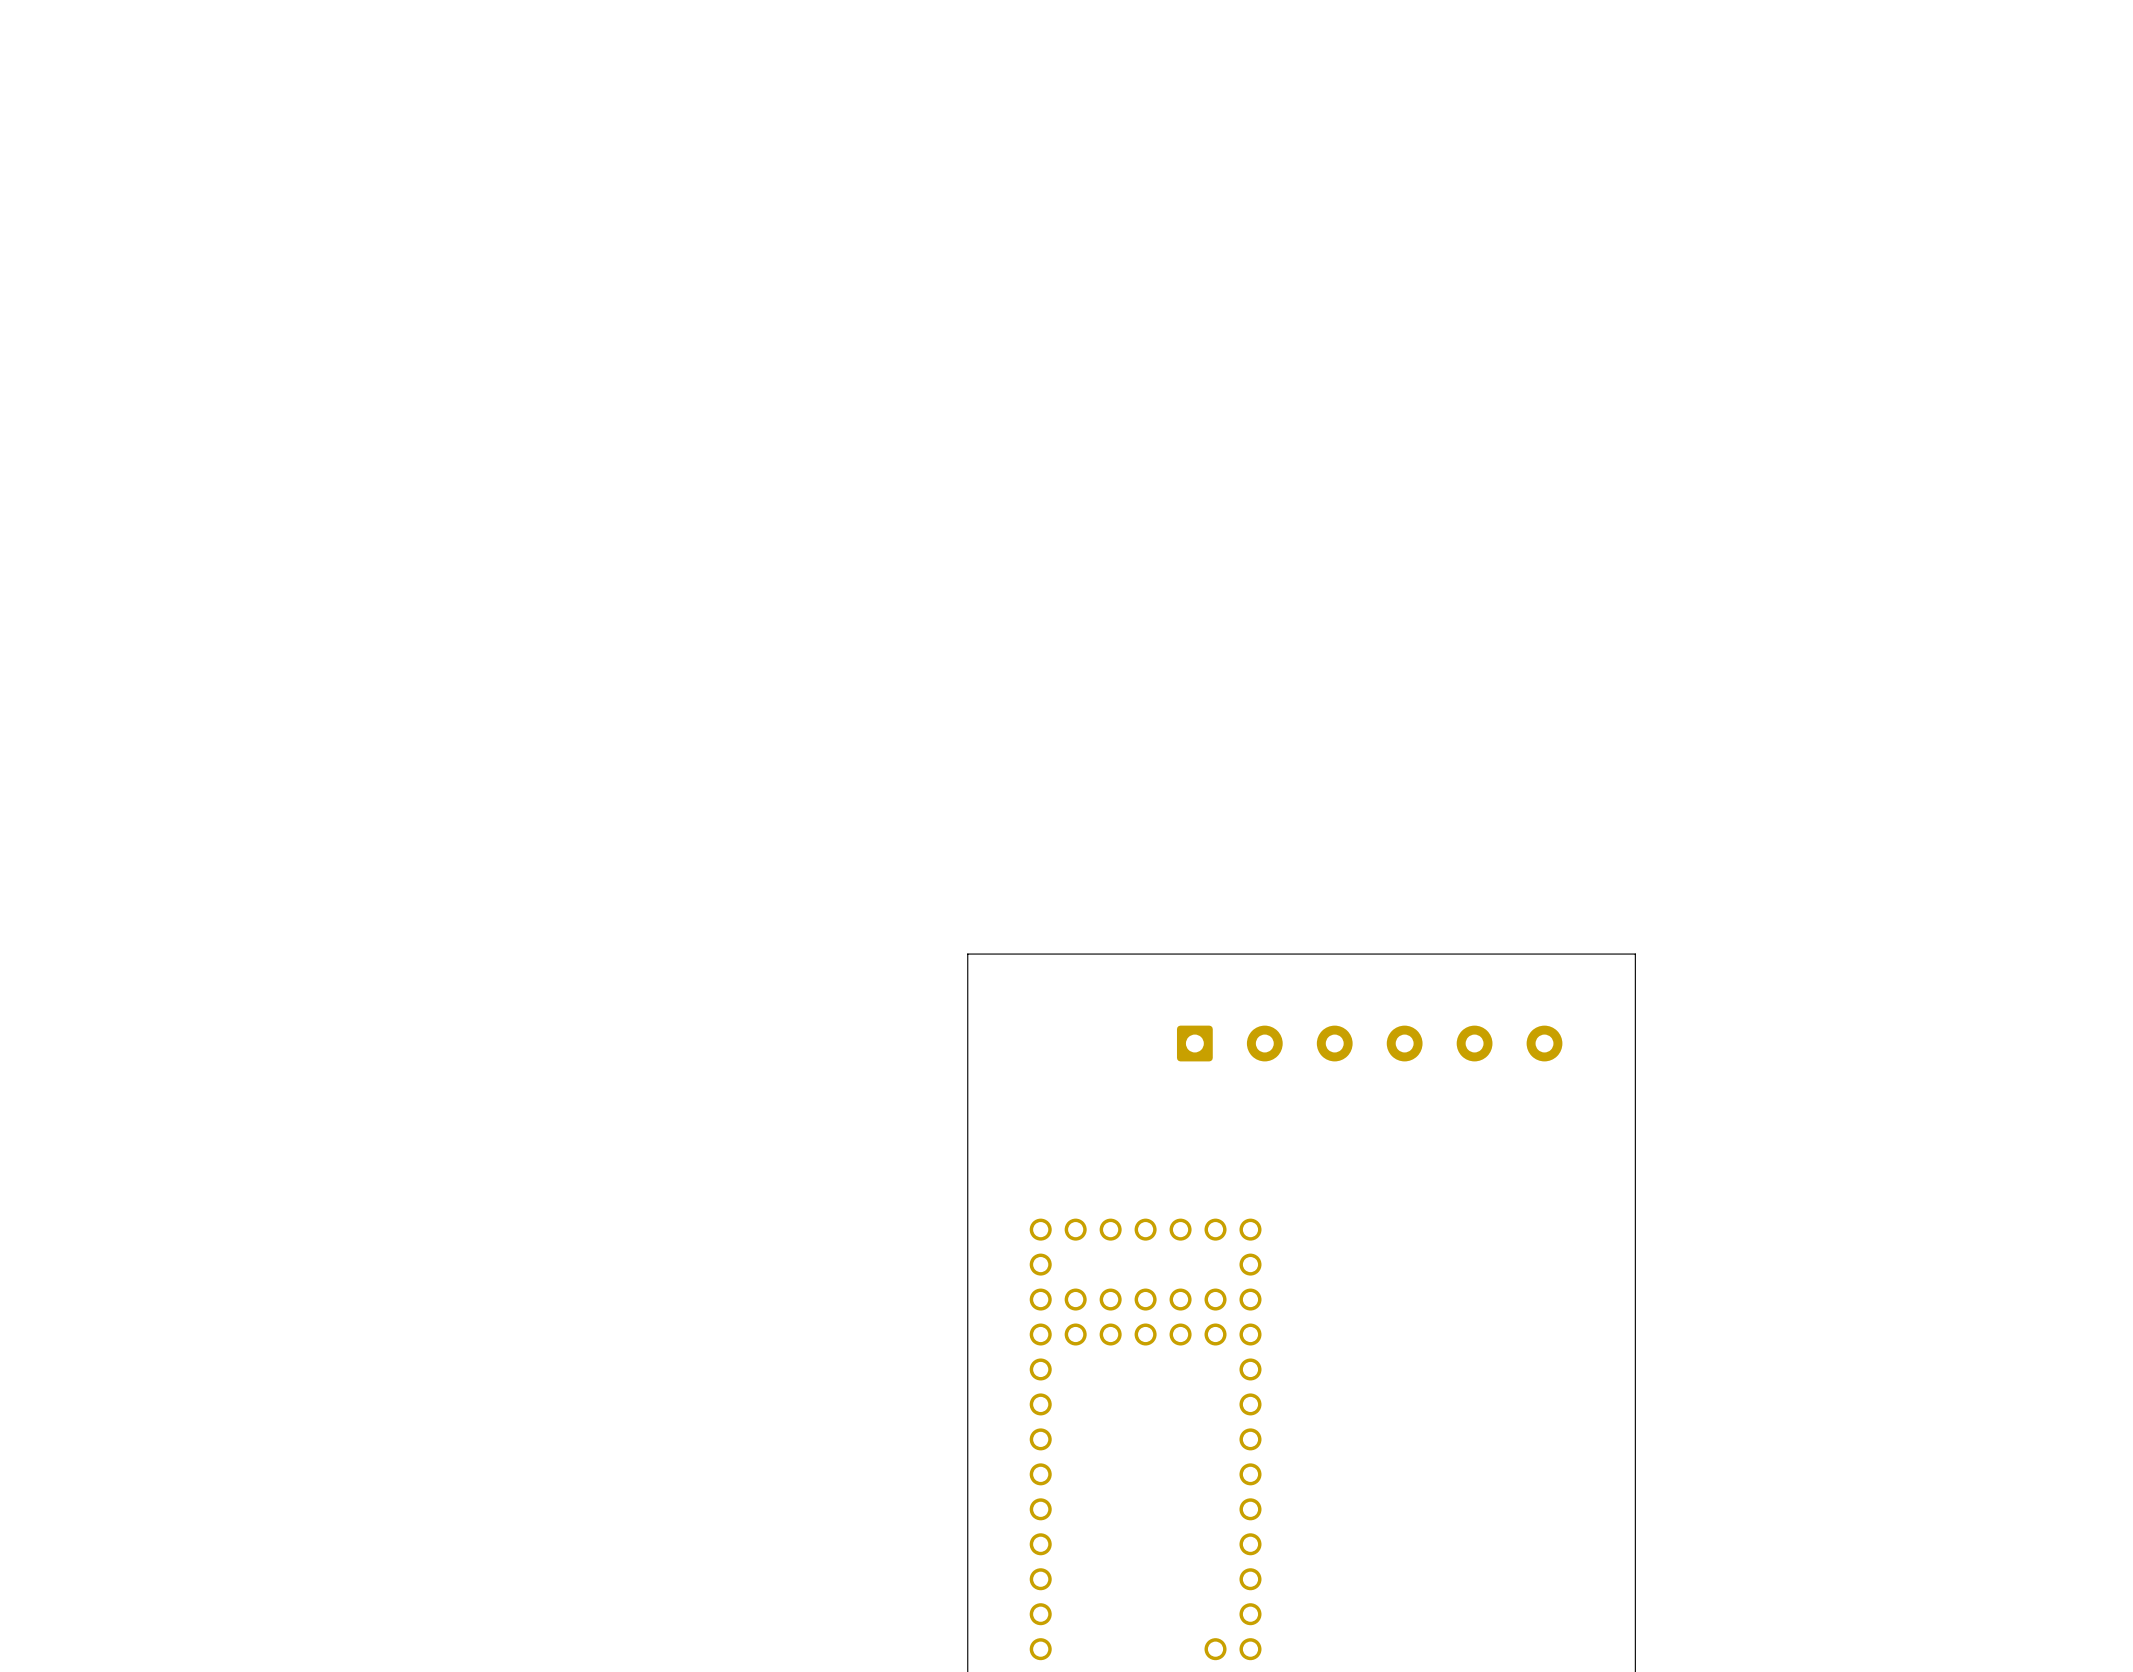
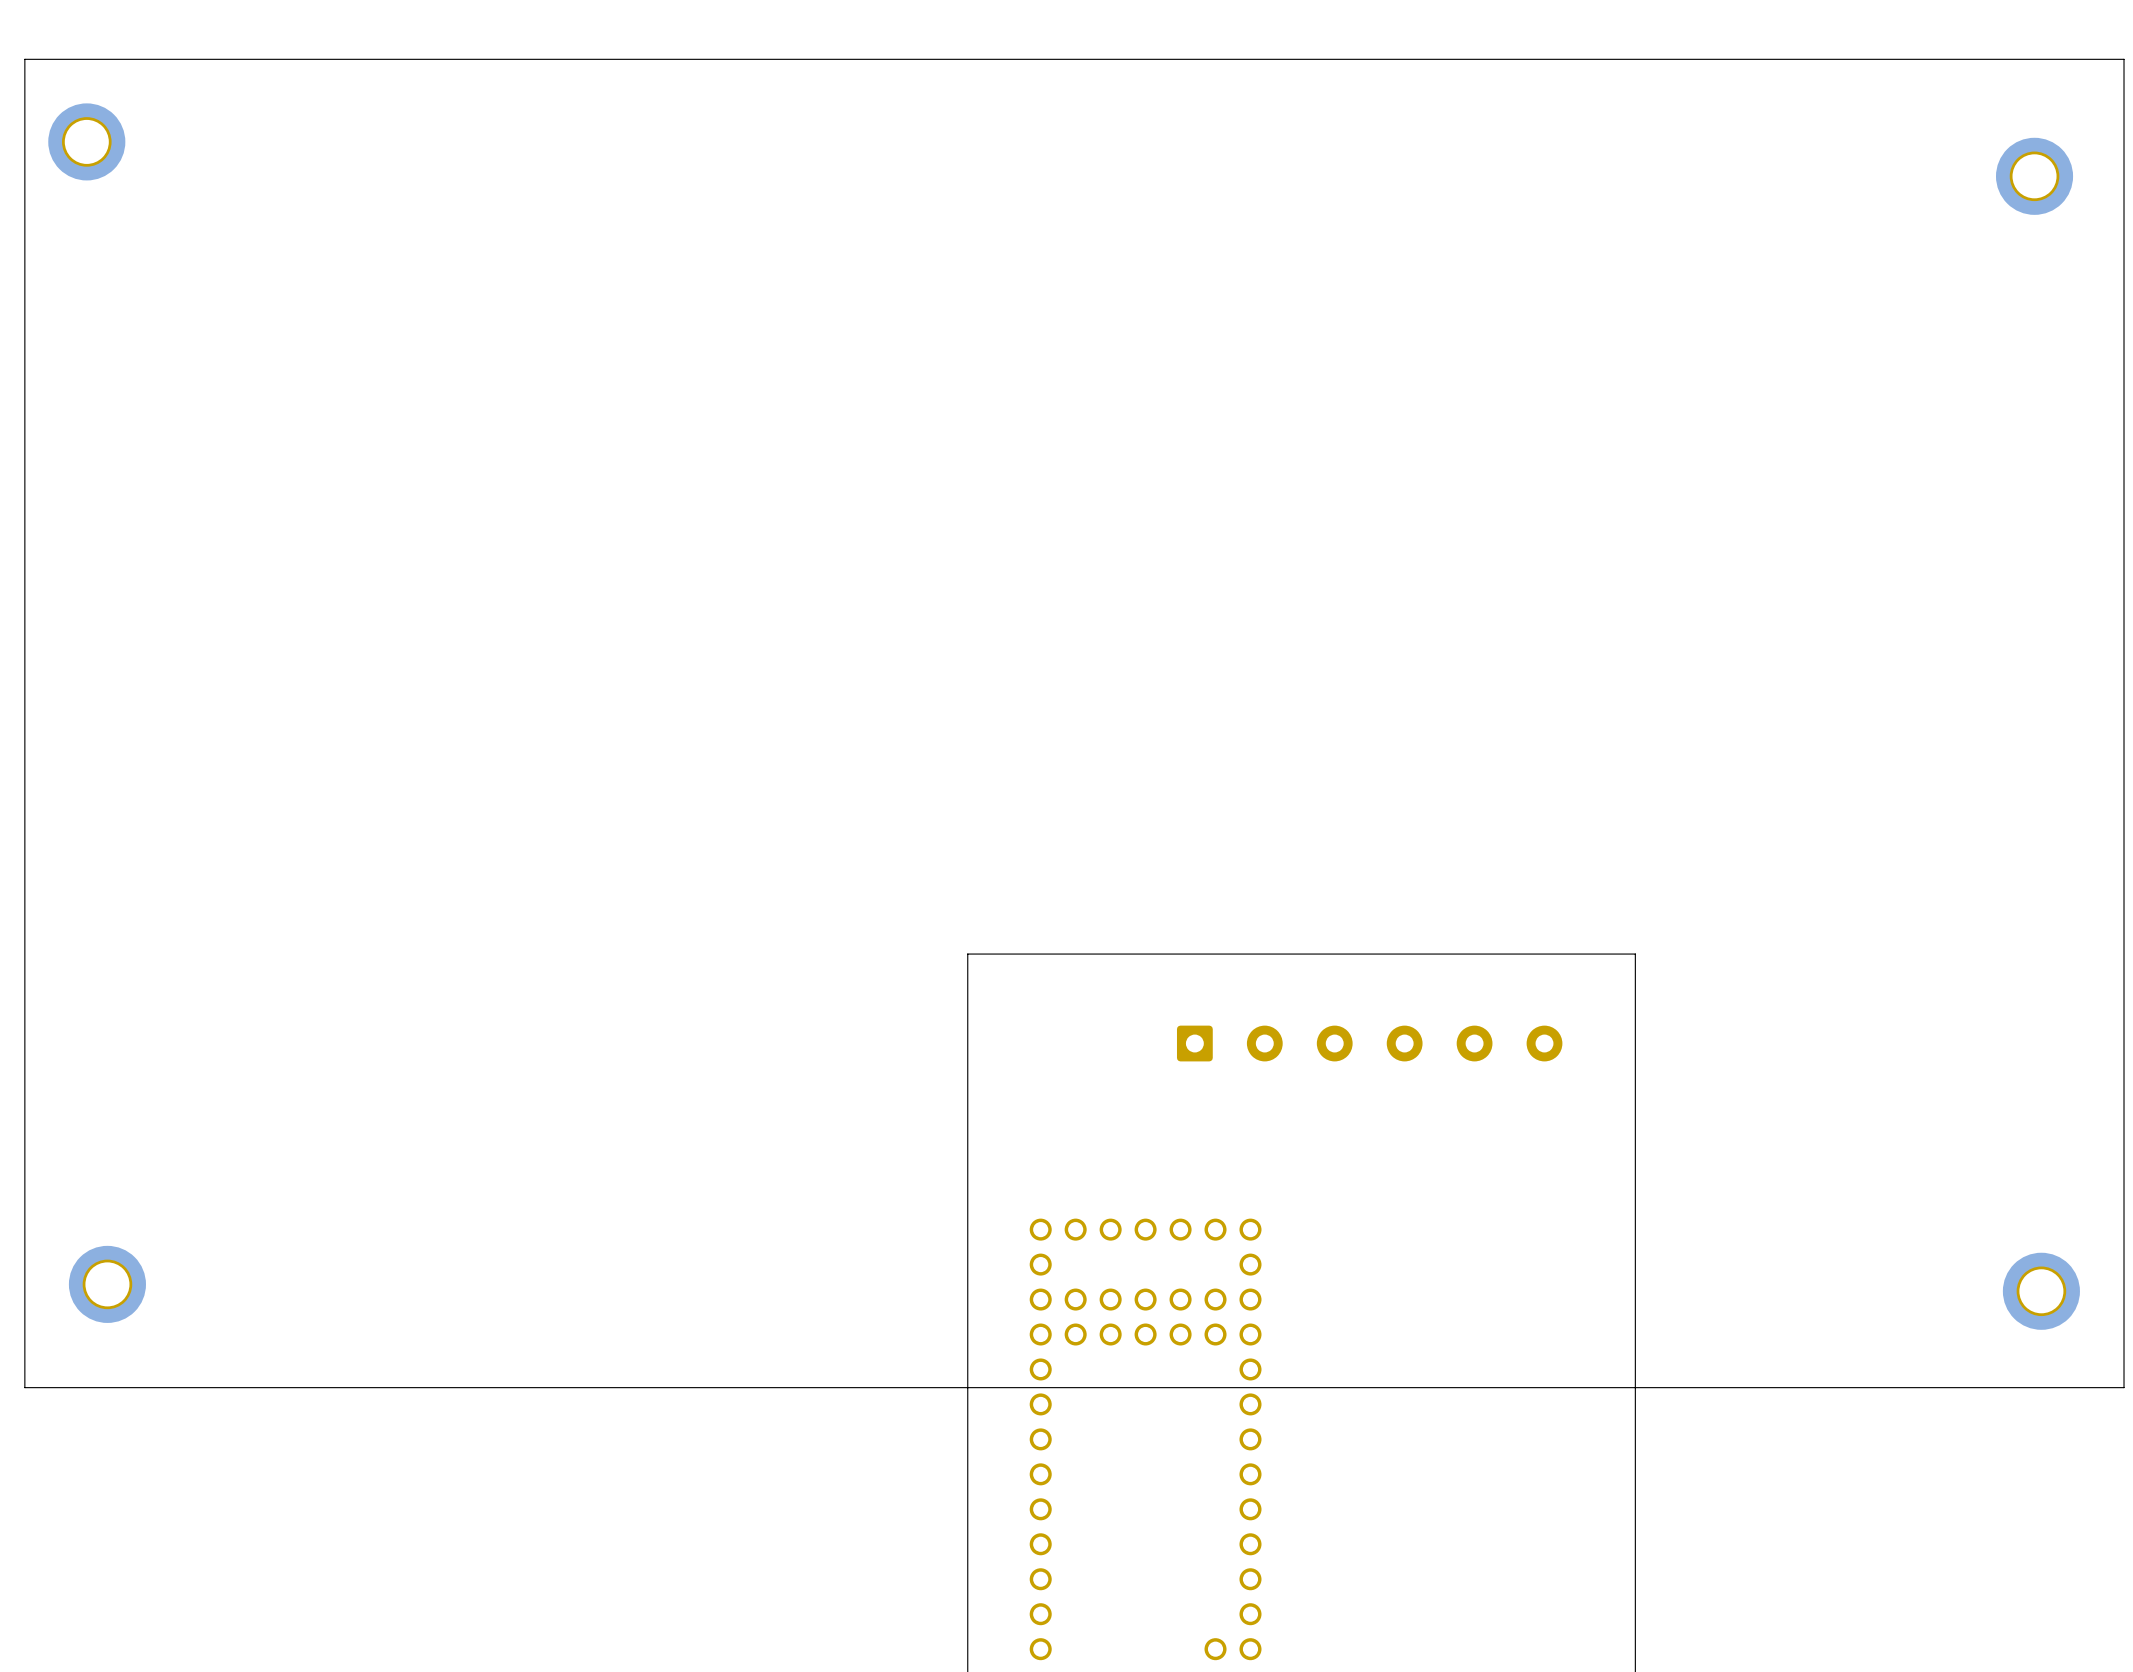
board edge: none -> (2124, 59) (24, 59) (24, 1387) (2124, 1387) (2124, 59)
part: none -> (86, 141)
part: none -> (2034, 176)
part: none -> (107, 1284)
part: none -> (2041, 1291)

